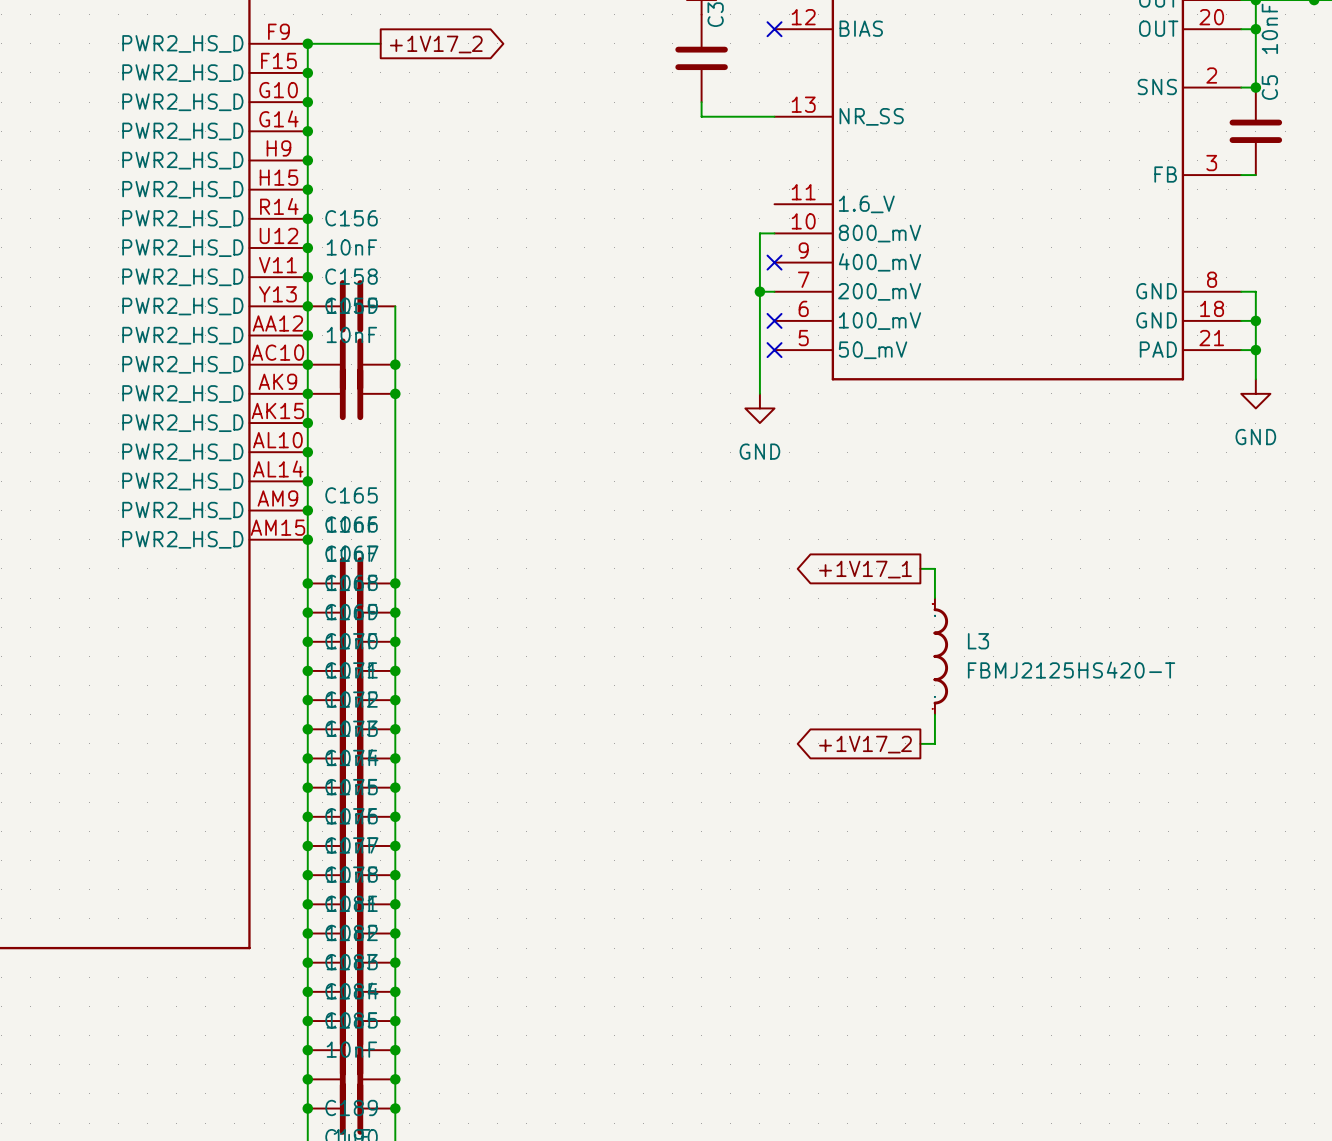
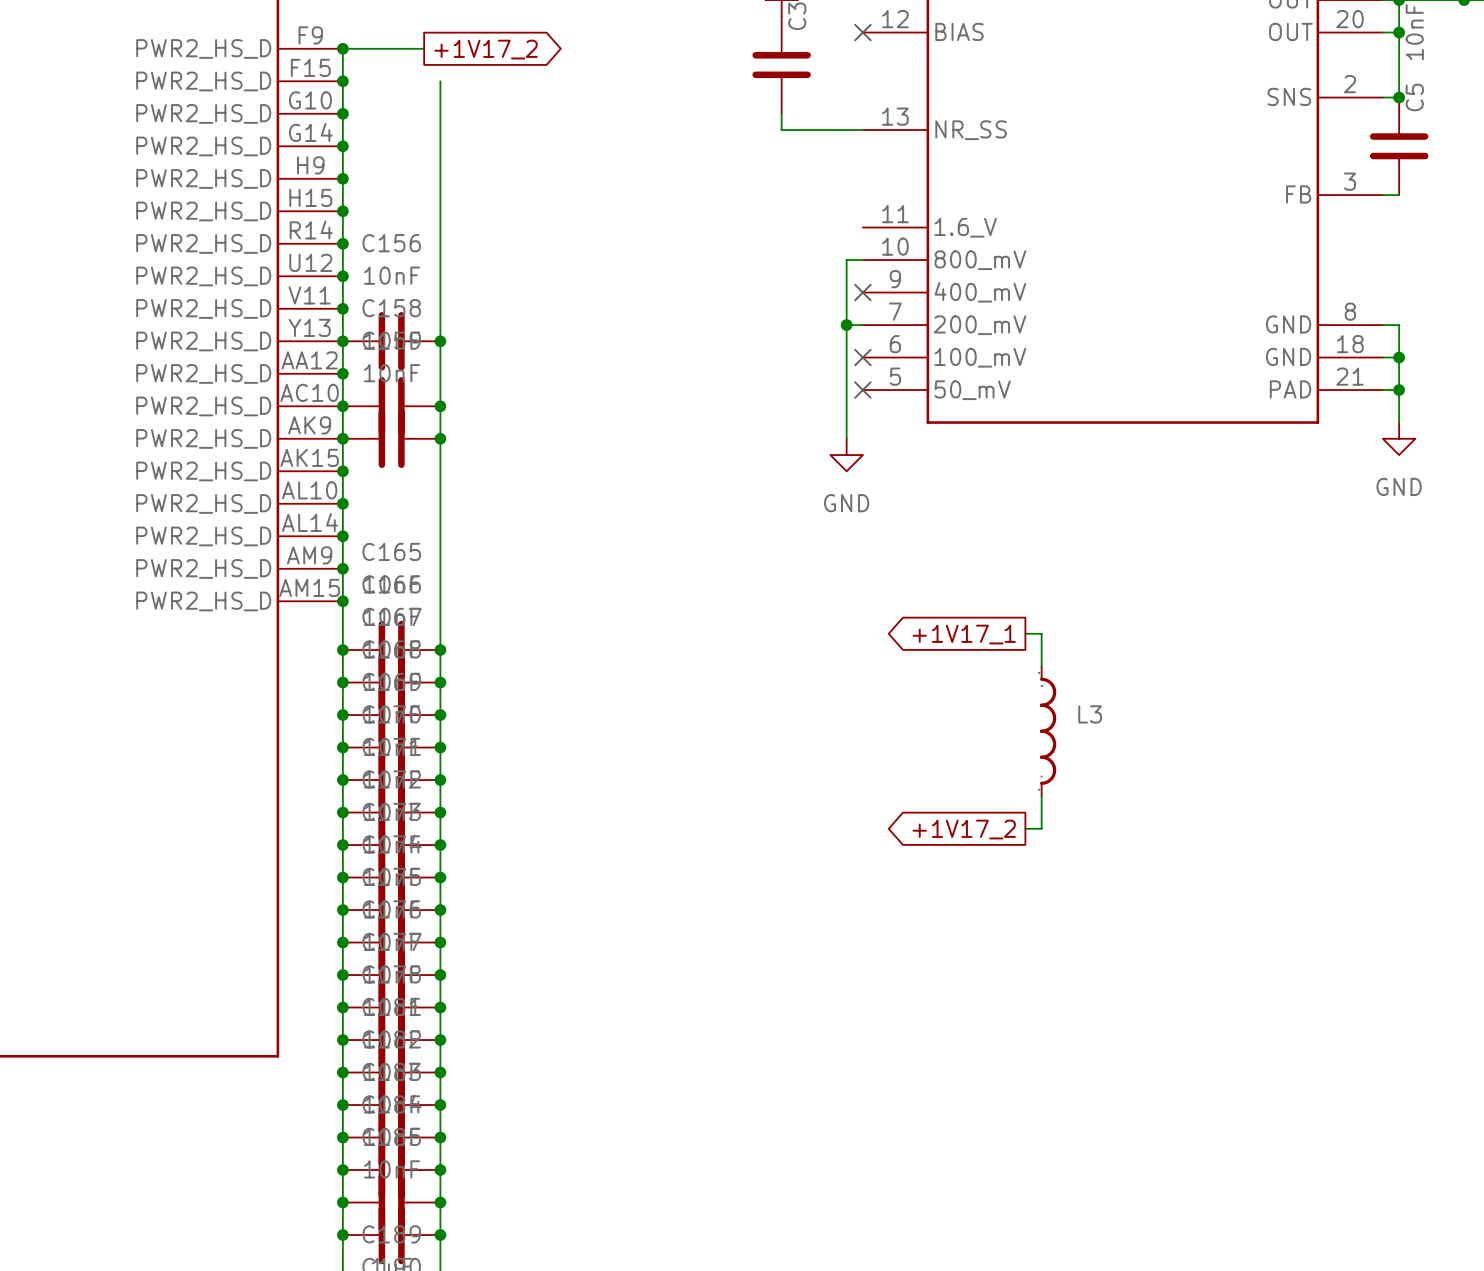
wire: none -> (440, 81) (440, 341)
junction: none -> (440, 341)
L3 value: FBMJ2125HS420-T (1071, 670) -> none

